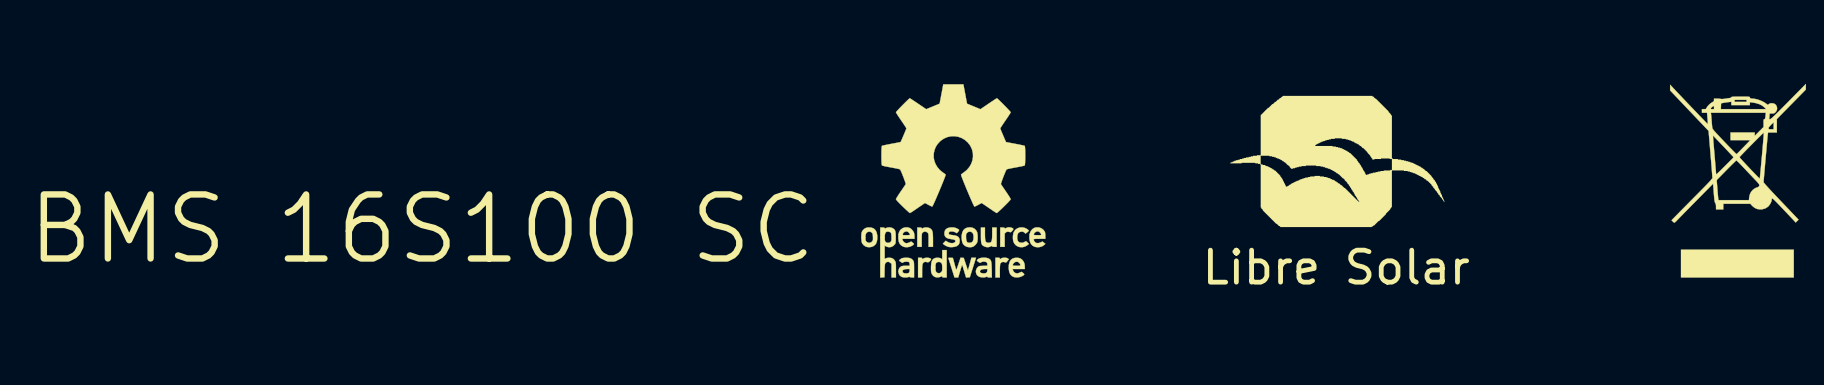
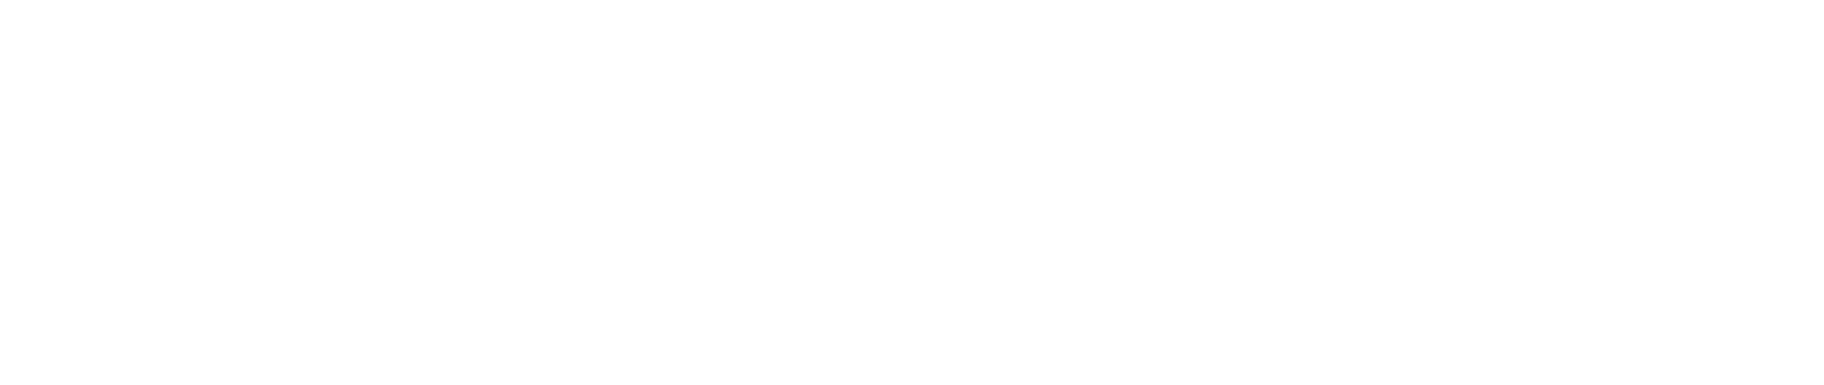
drawing: [1669, 83, 1806, 278] -> none
drawing: [861, 84, 1046, 278] -> none
drawing: [1230, 95, 1445, 228] -> none
text: BMS 16S100 SC (423, 226) -> none

